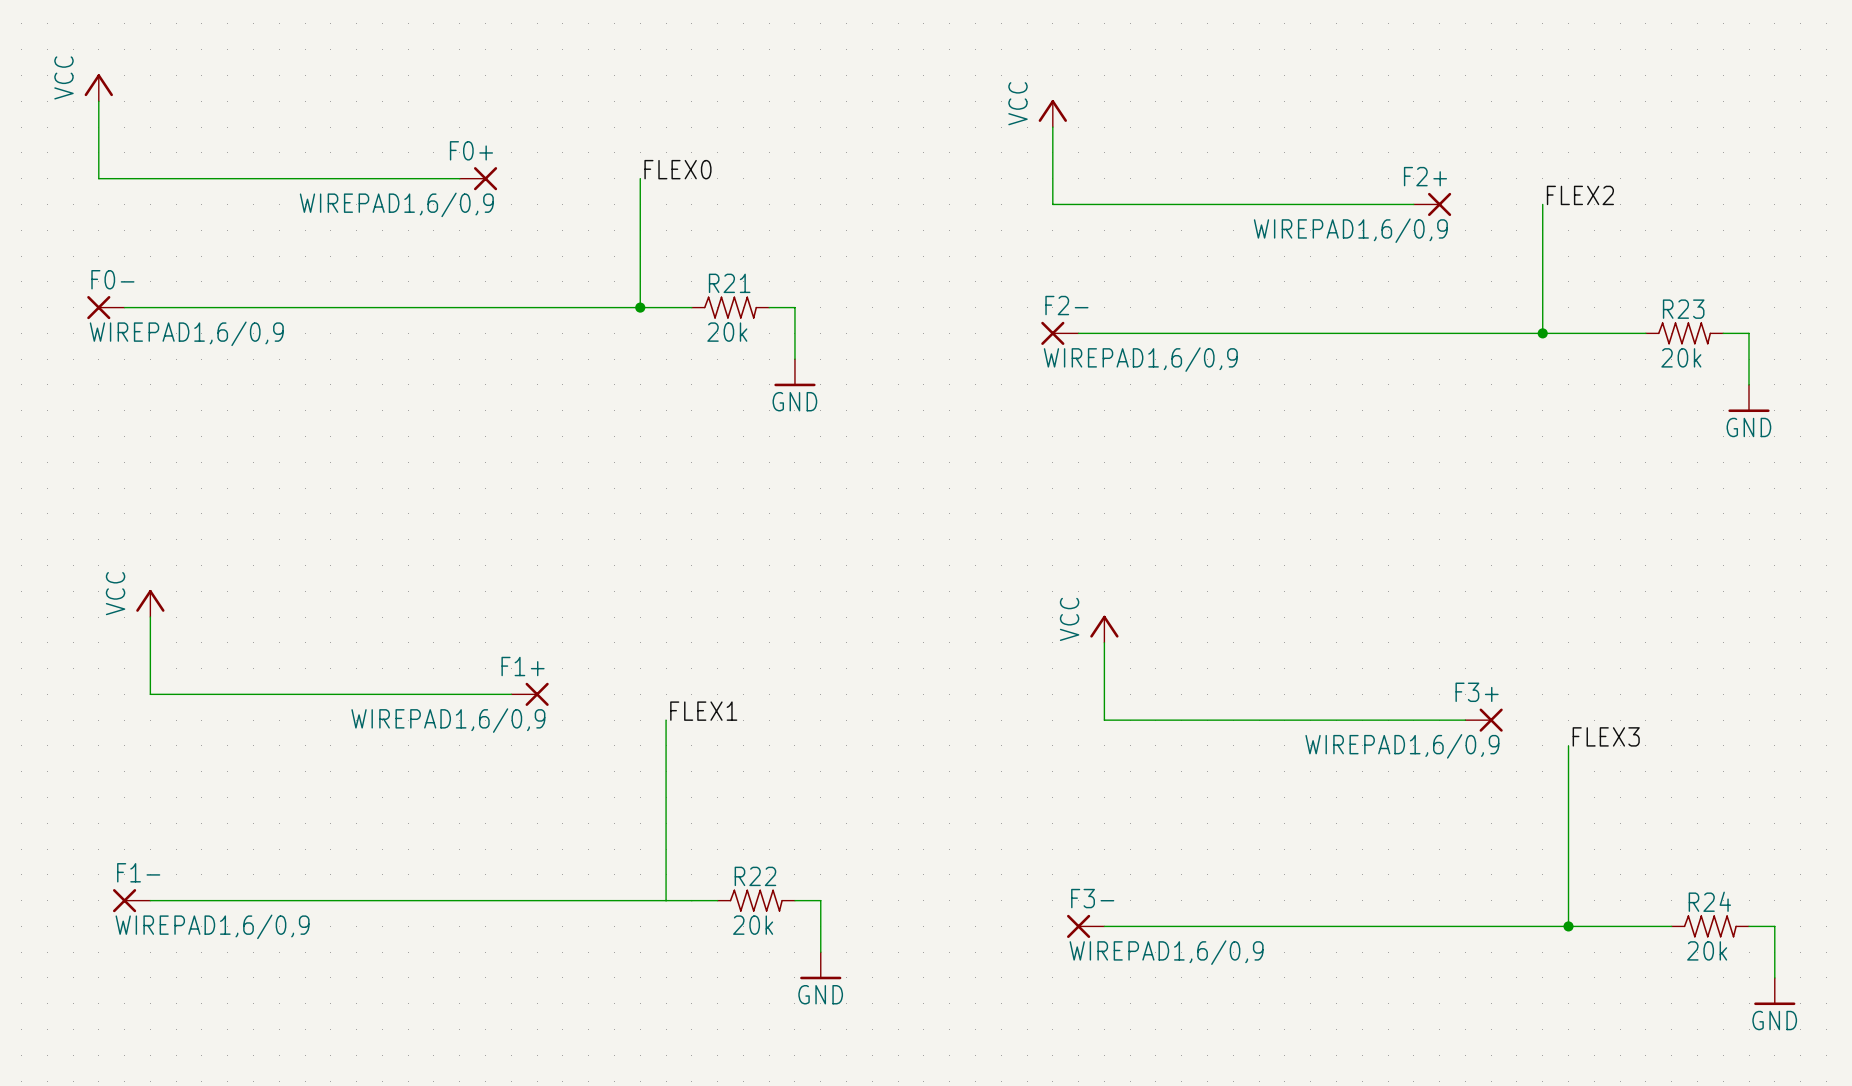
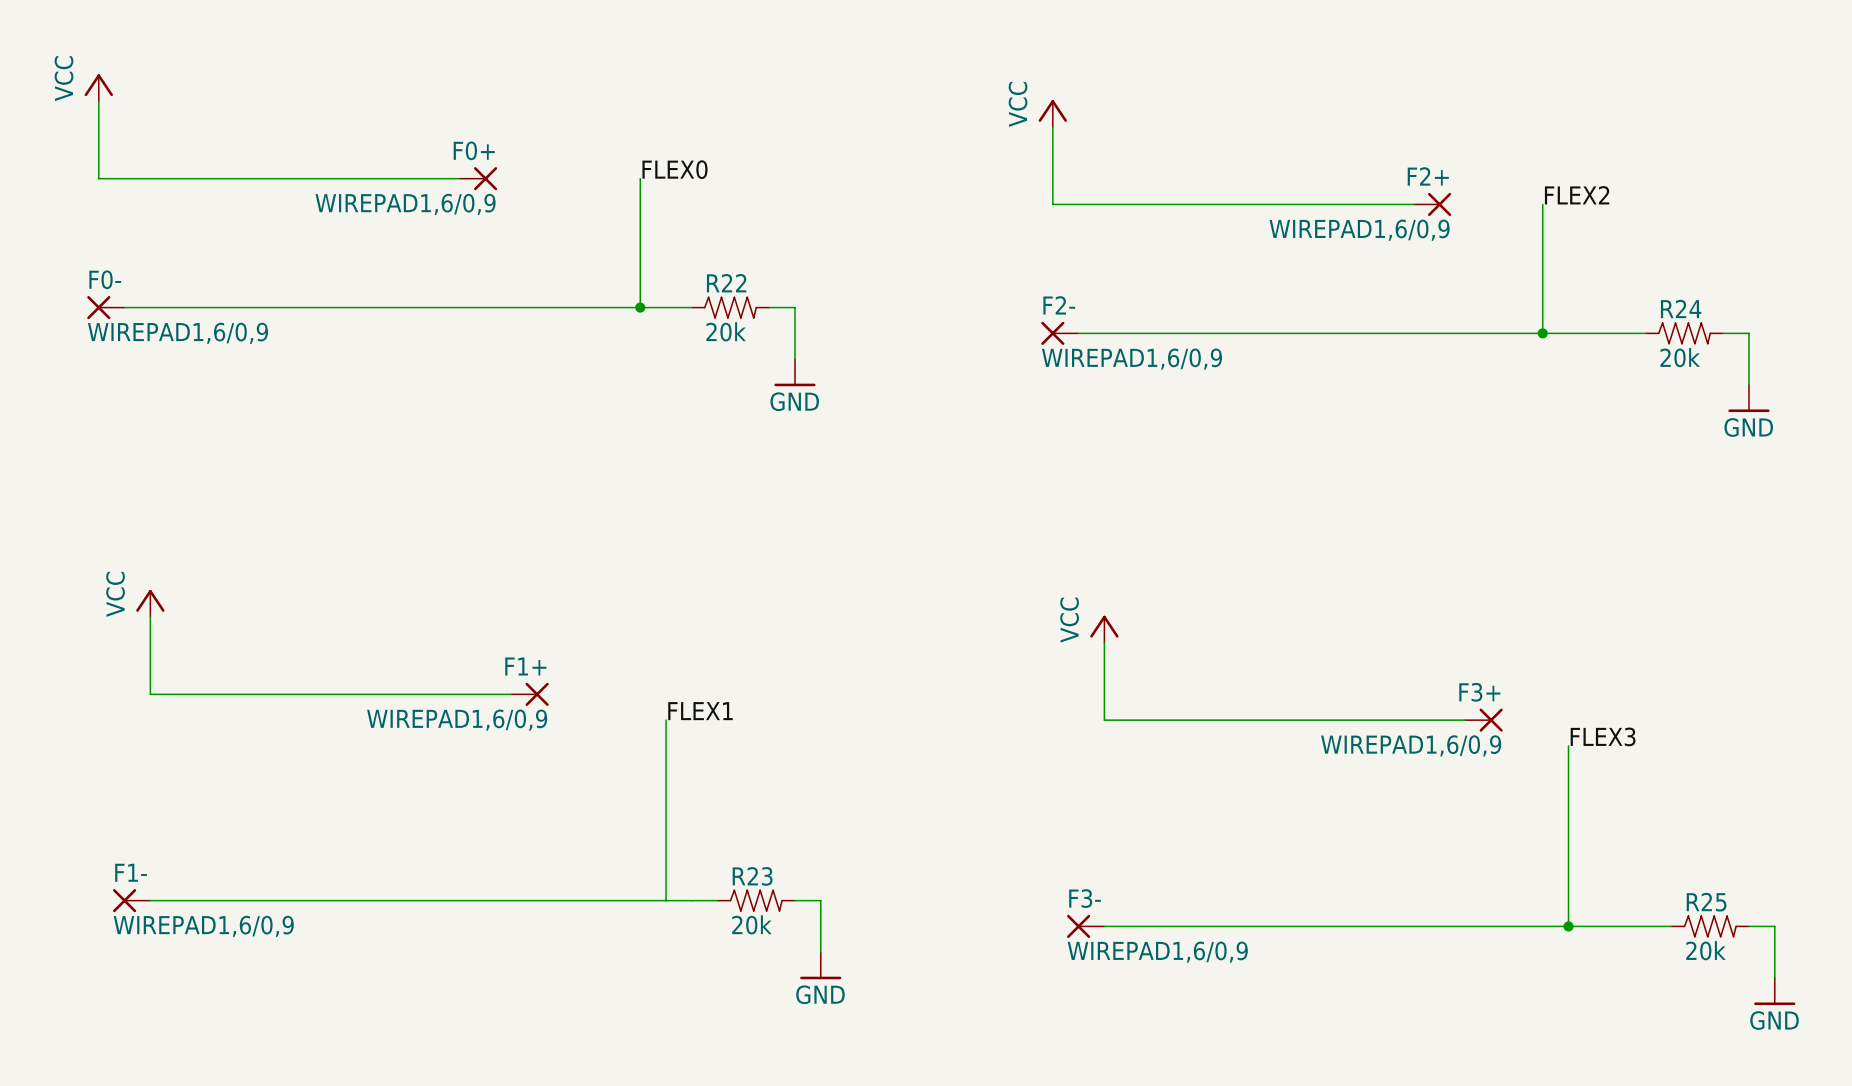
R21 name: R21 (729, 283) -> R22 (726, 283)
R23 name: R23 (1683, 309) -> R24 (1681, 308)
R22 name: R22 (755, 876) -> R23 (752, 876)
R24 name: R24 (1709, 901) -> R25 (1706, 902)

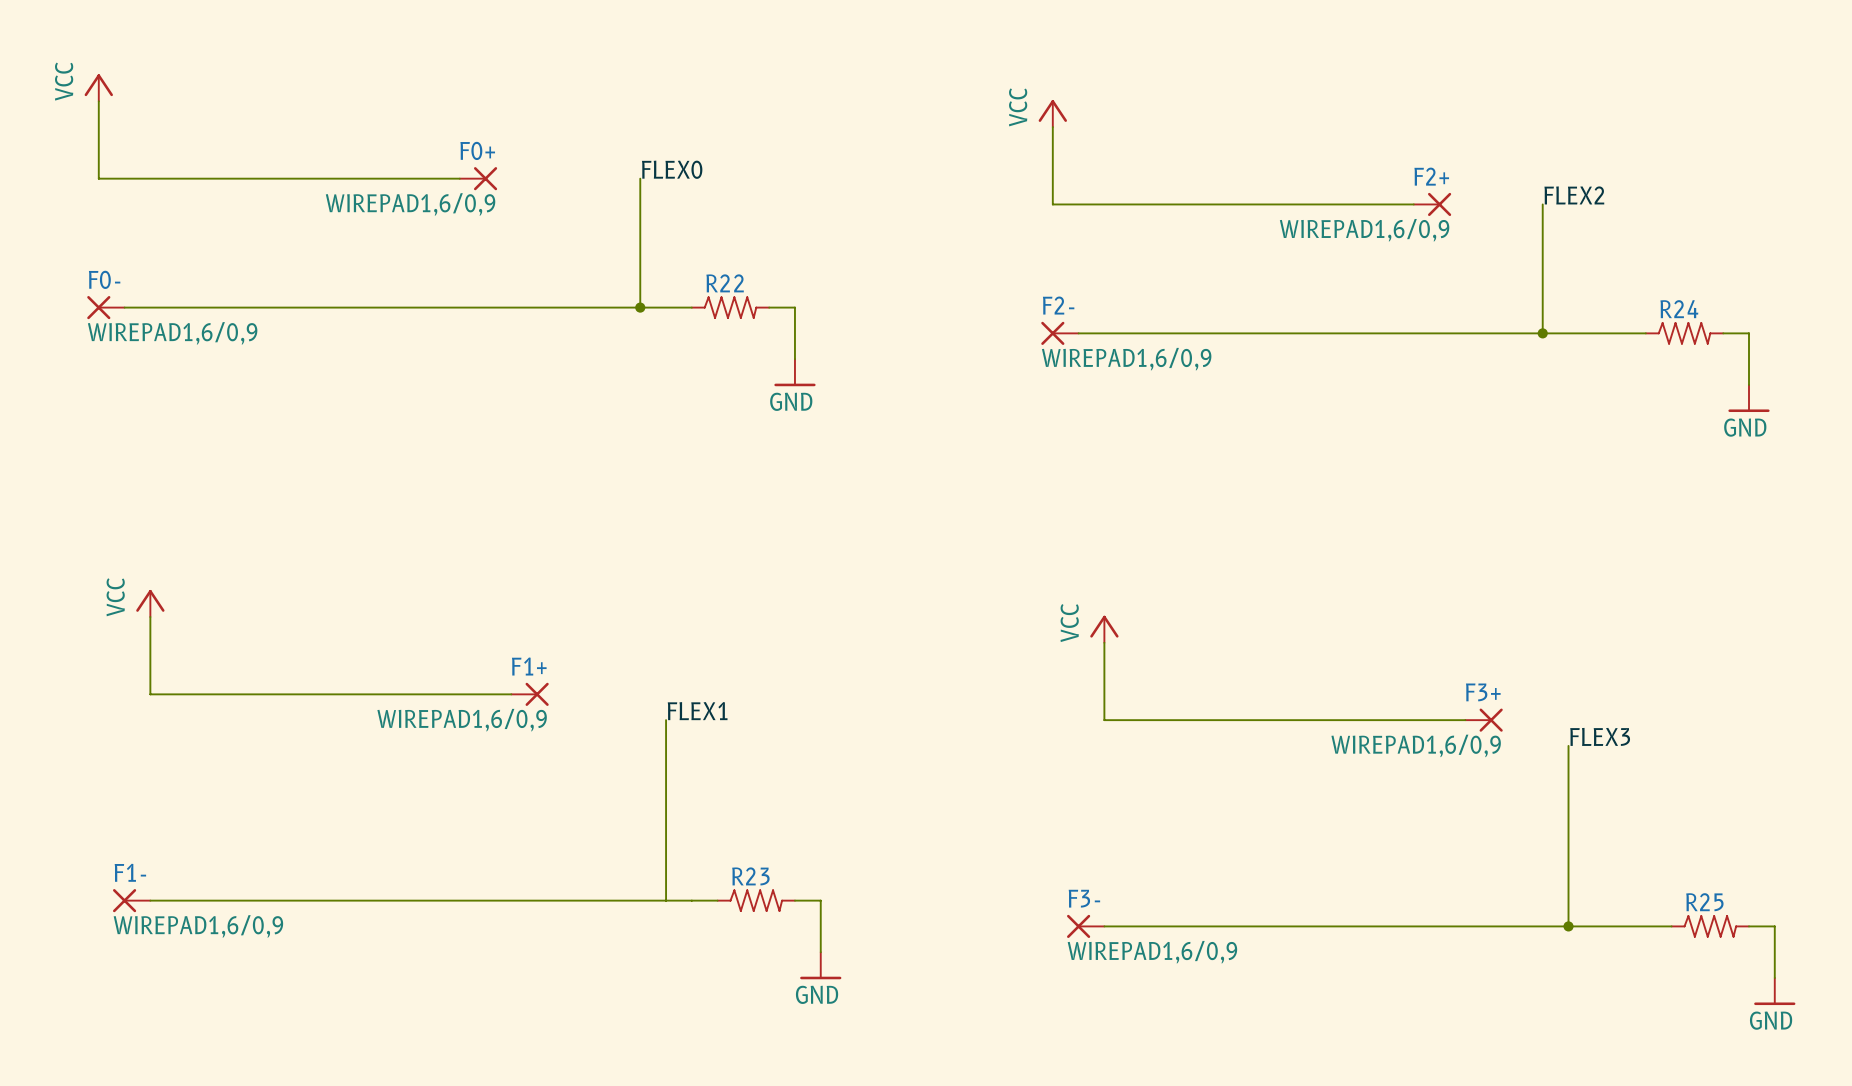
R22 value: 20k (726, 331) -> none
R24 value: 20k (1680, 357) -> none
R23 value: 20k (751, 924) -> none
R25 value: 20k (1705, 950) -> none

